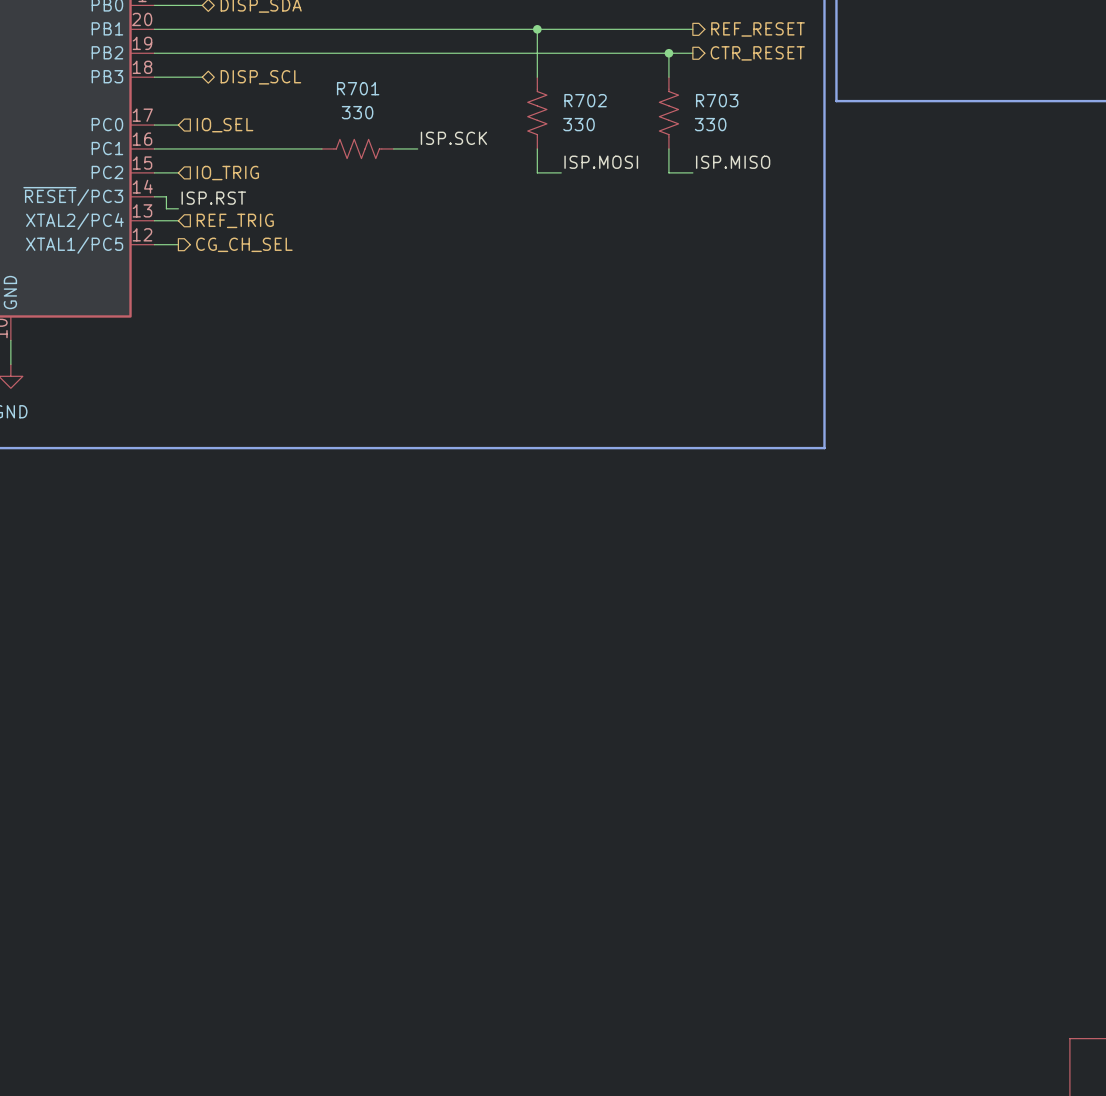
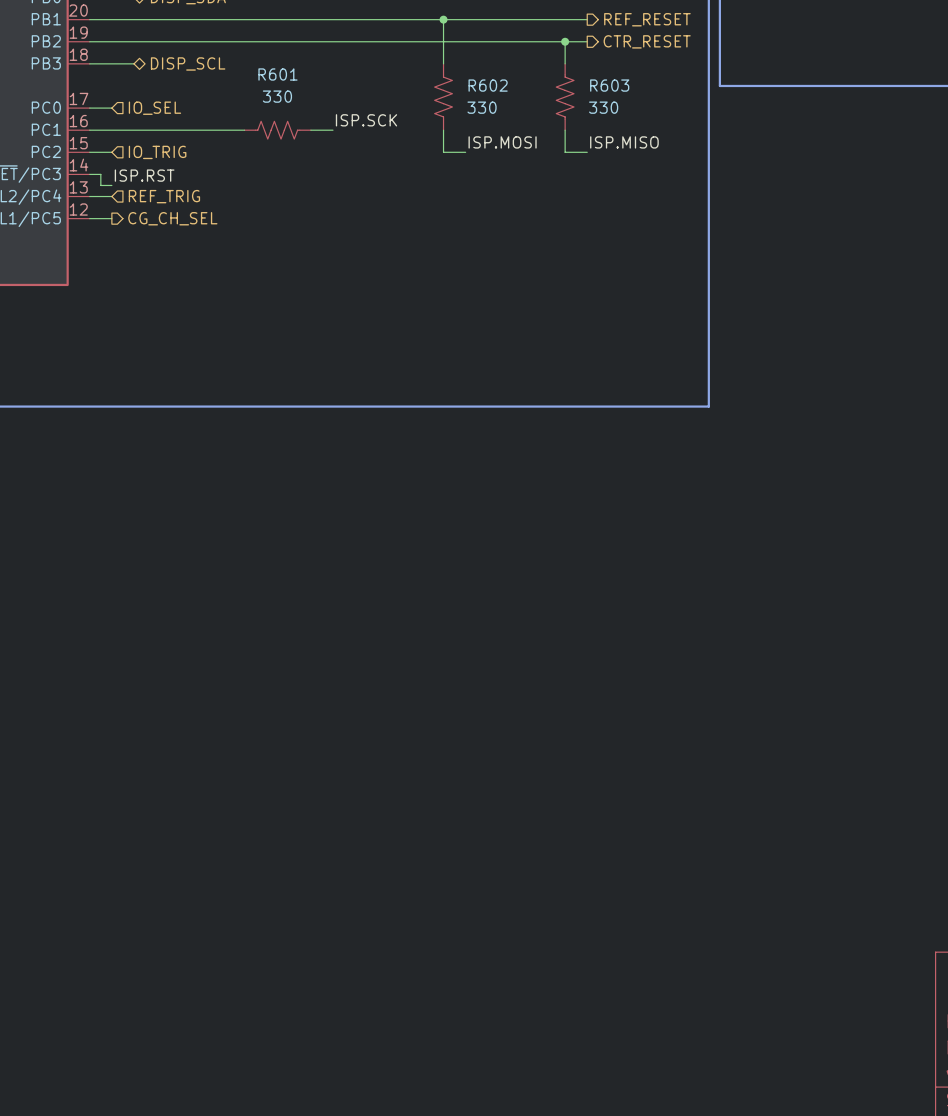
R701 name: R701 (358, 88) -> R601 (277, 74)
R702 name: R702 (585, 100) -> R602 (488, 85)
R703 name: R703 (717, 100) -> R603 (609, 85)

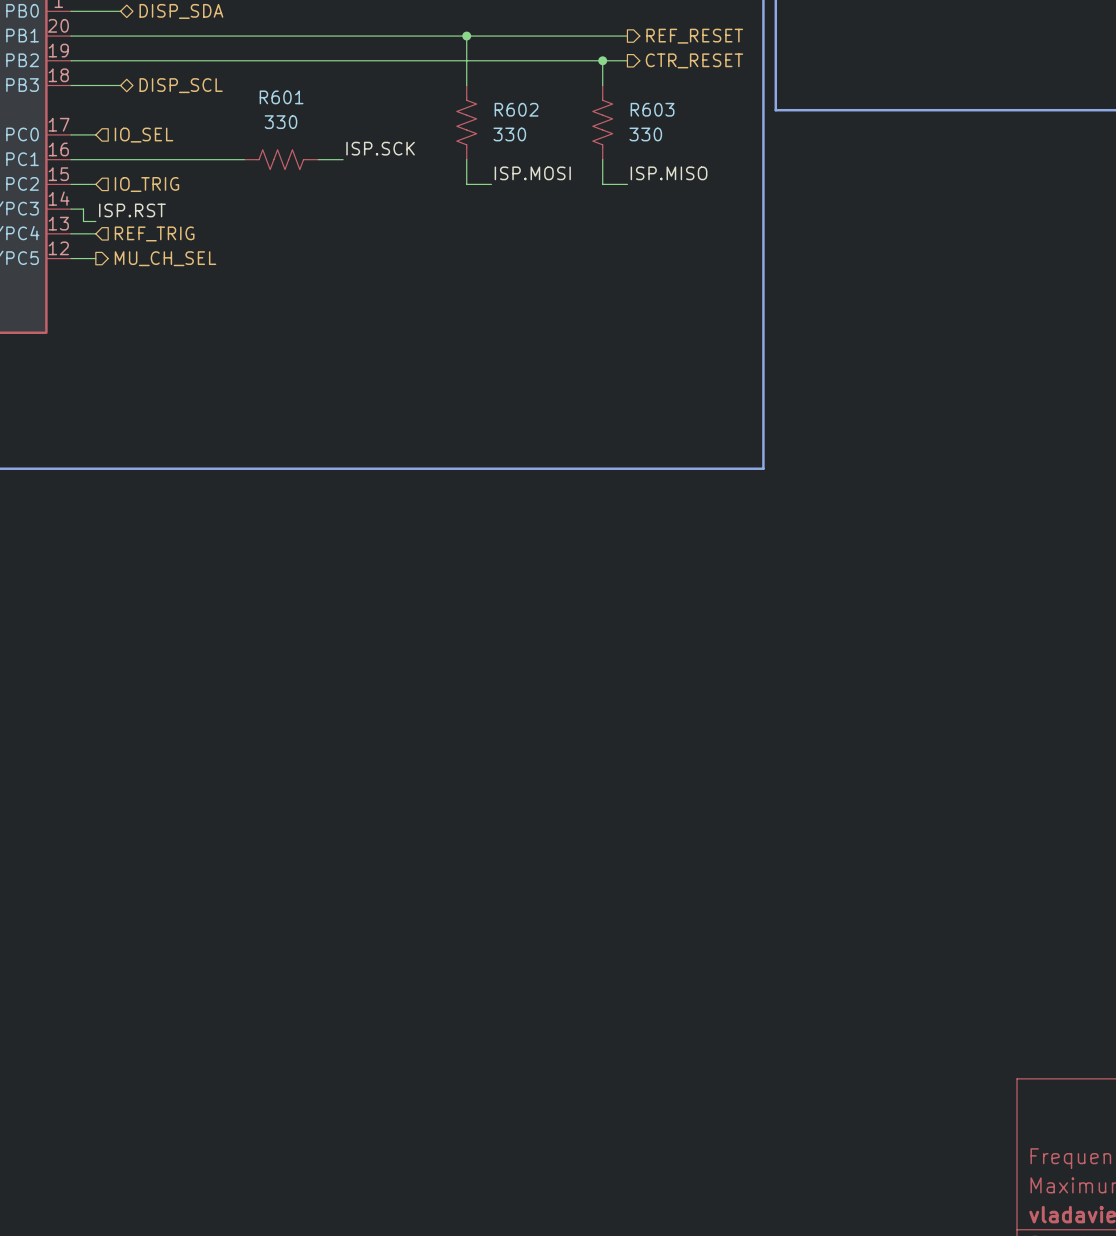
hierarchical label: CG_CH_SEL (172, 218) -> MU_CH_SEL (165, 258)

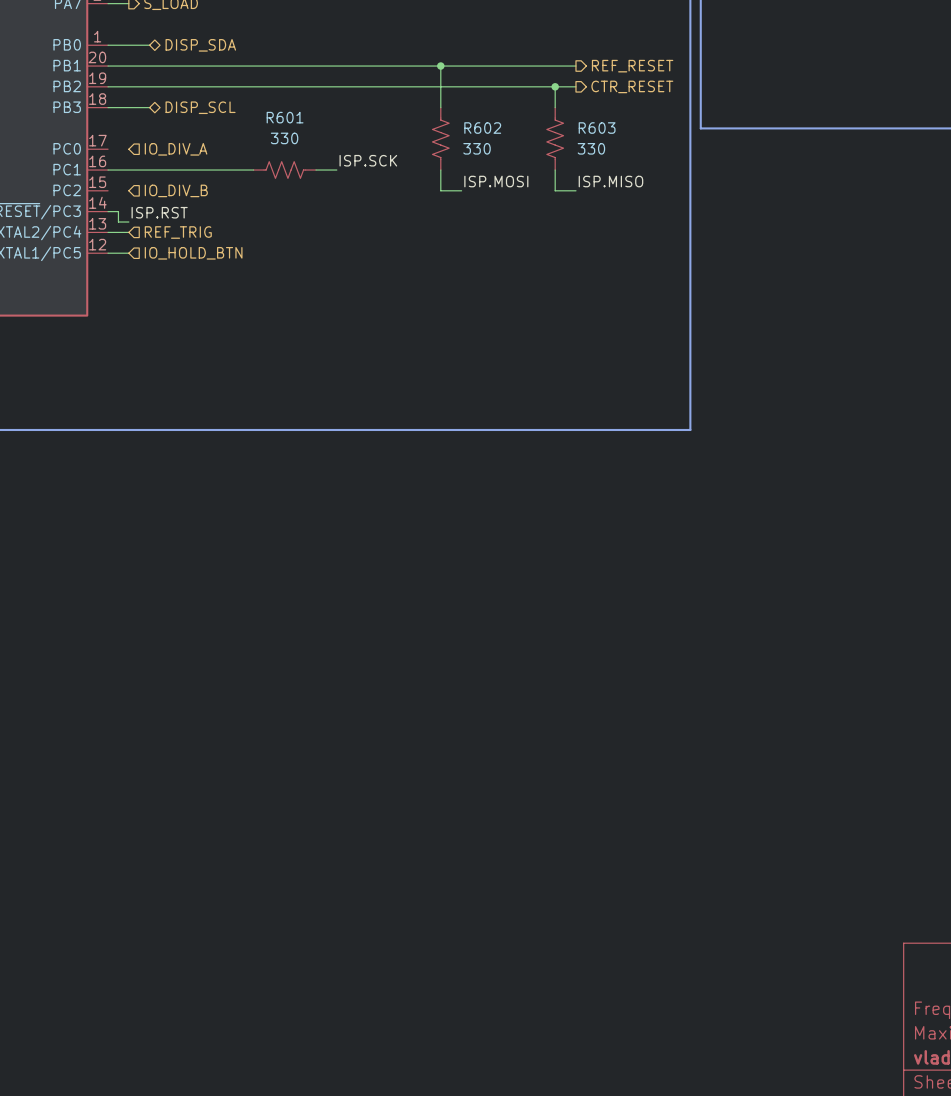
wire: (71, 134) (95, 134) -> none
hierarchical label: IO_SEL (144, 135) -> IO_DIV_A (176, 149)
wire: (71, 184) (95, 184) -> none
hierarchical label: IO_TRIG (146, 184) -> IO_DIV_B (176, 190)
hierarchical label shape: output (165, 258) -> input (193, 253)
hierarchical label: MU_CH_SEL (165, 258) -> IO_HOLD_BTN (193, 253)

